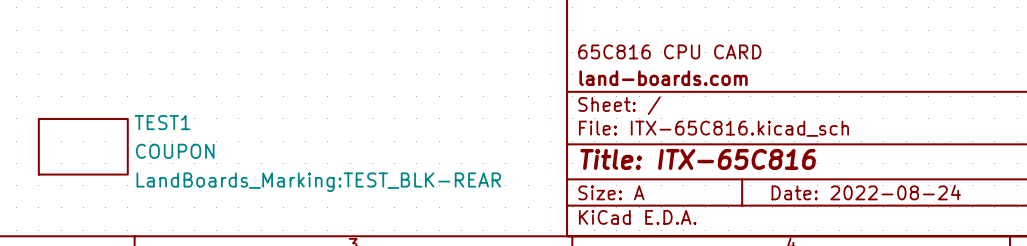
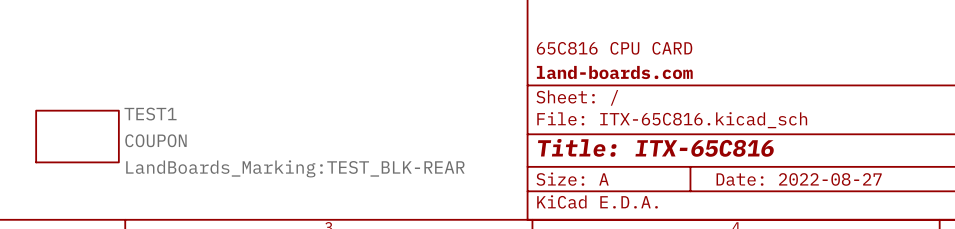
title block: Date: 2022-08-24 (866, 192) -> Date: 2022-08-27 (799, 179)

